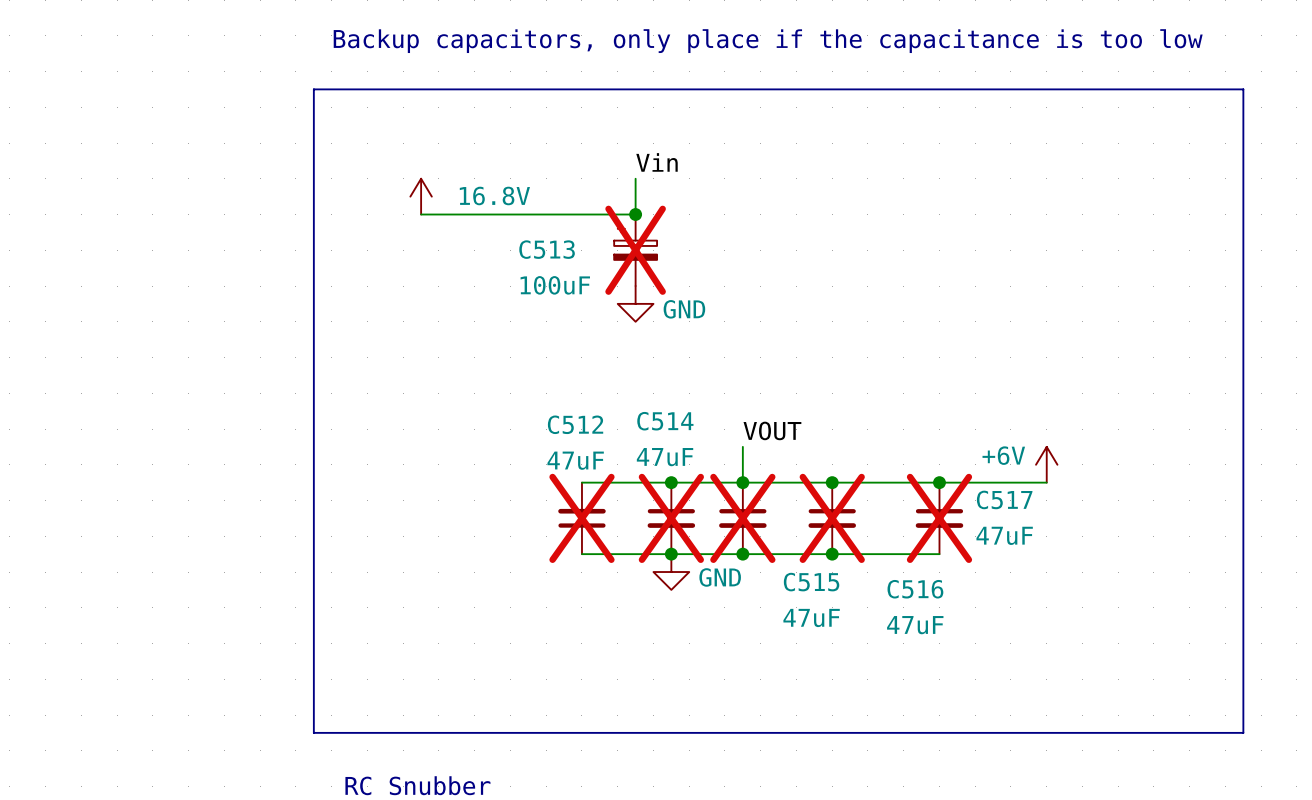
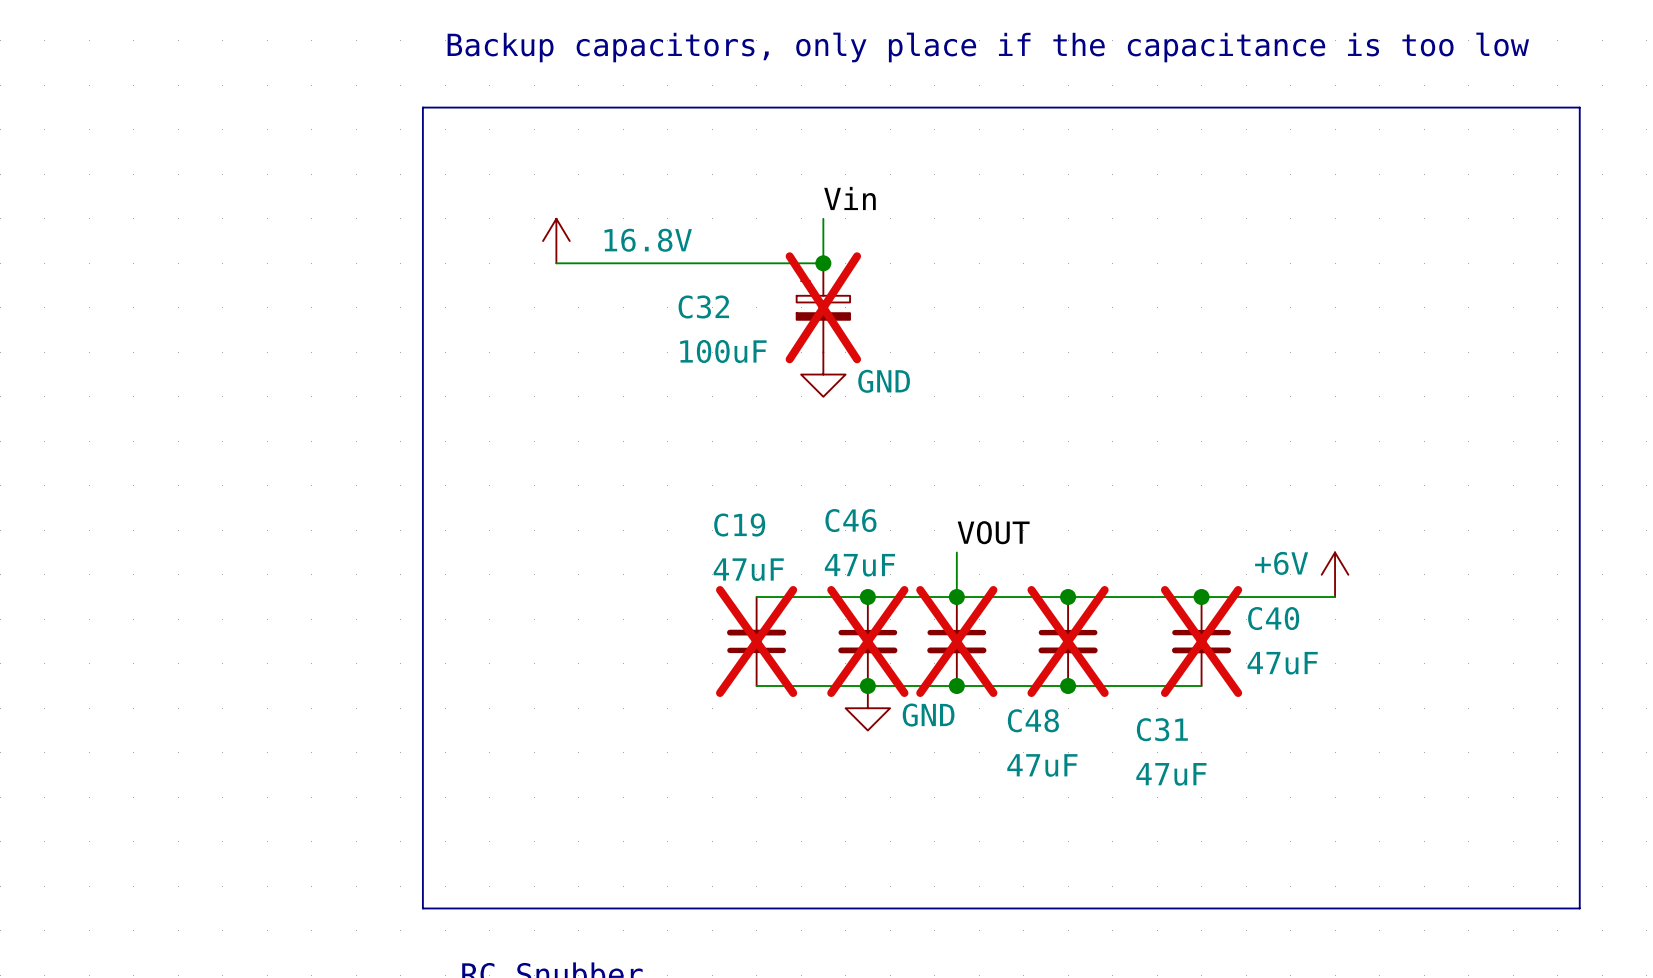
C513 name: C513 (547, 249) -> C32 (703, 306)
C514 name: C514 (665, 421) -> C46 (850, 520)
C512 name: C512 (575, 424) -> C19 (739, 525)
C517 name: C517 (1004, 499) -> C40 (1273, 618)
C515 name: C515 (811, 582) -> C48 (1033, 720)
C516 name: C516 (915, 589) -> C31 (1162, 729)

